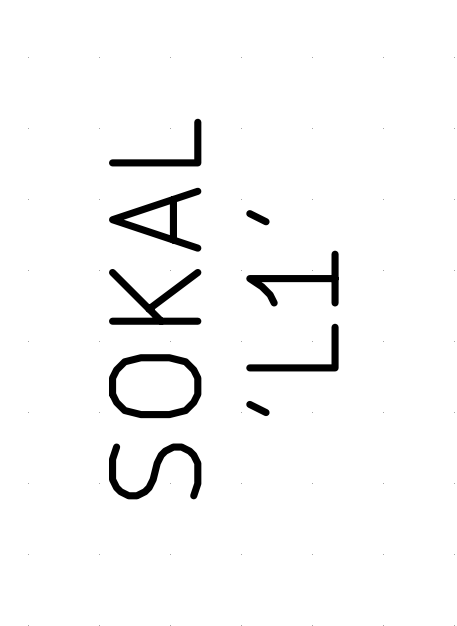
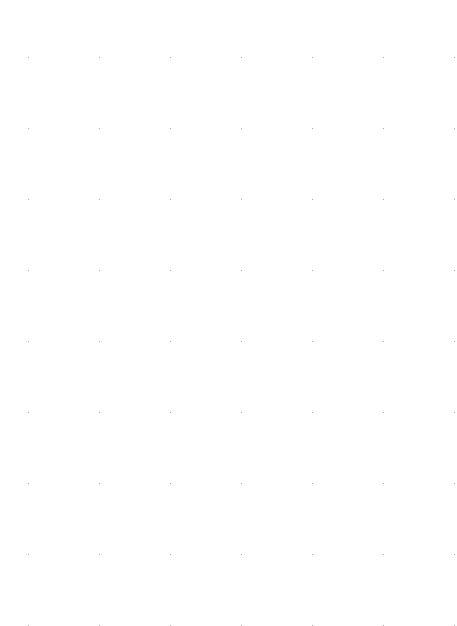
text: SOKAL (155, 309) -> none
text: 'L1' (292, 313) -> none

